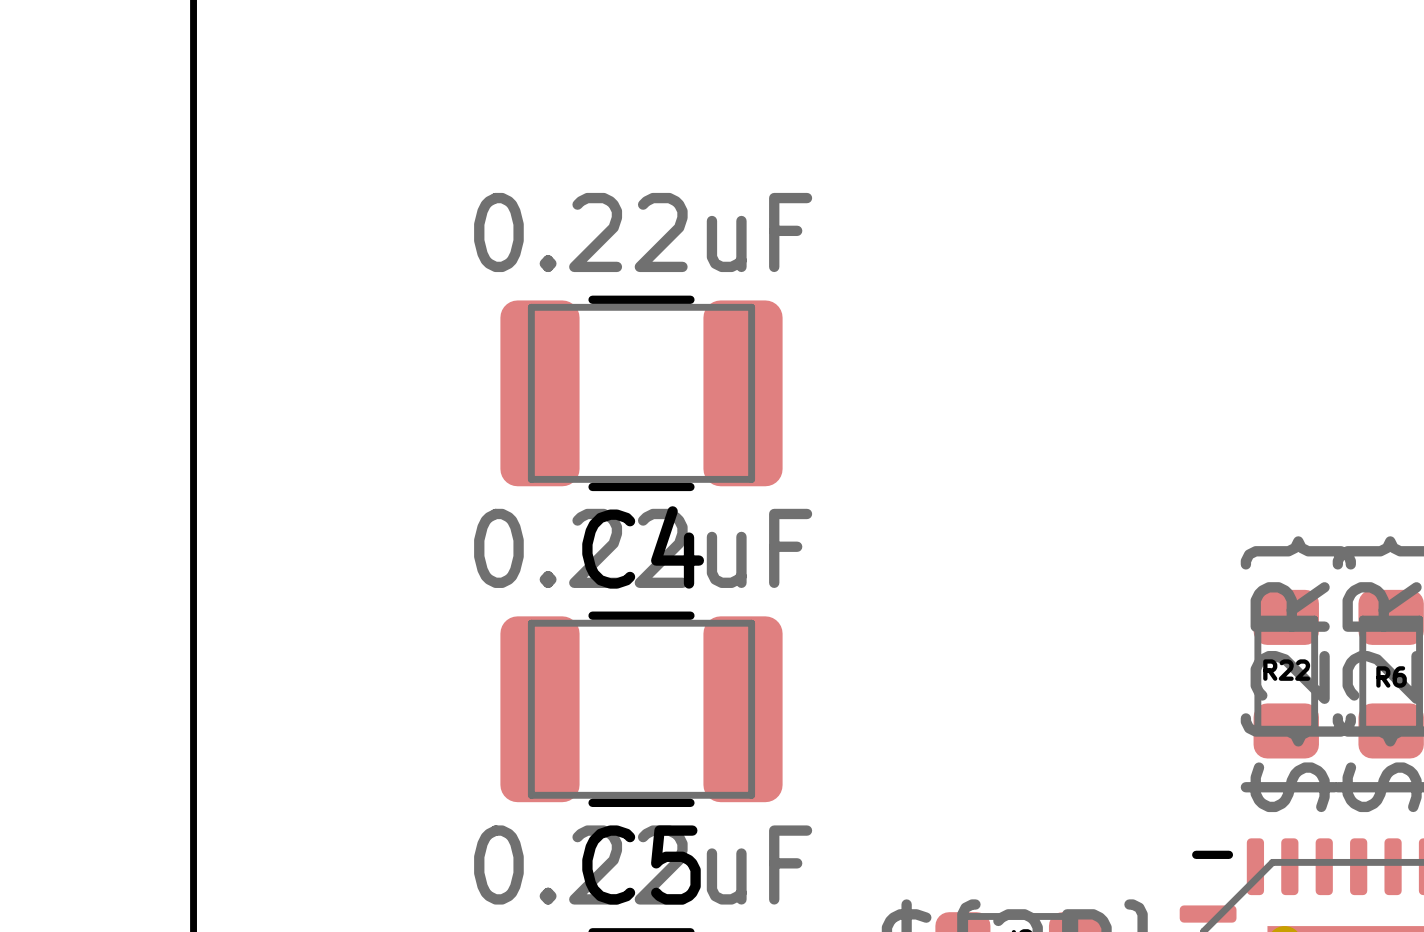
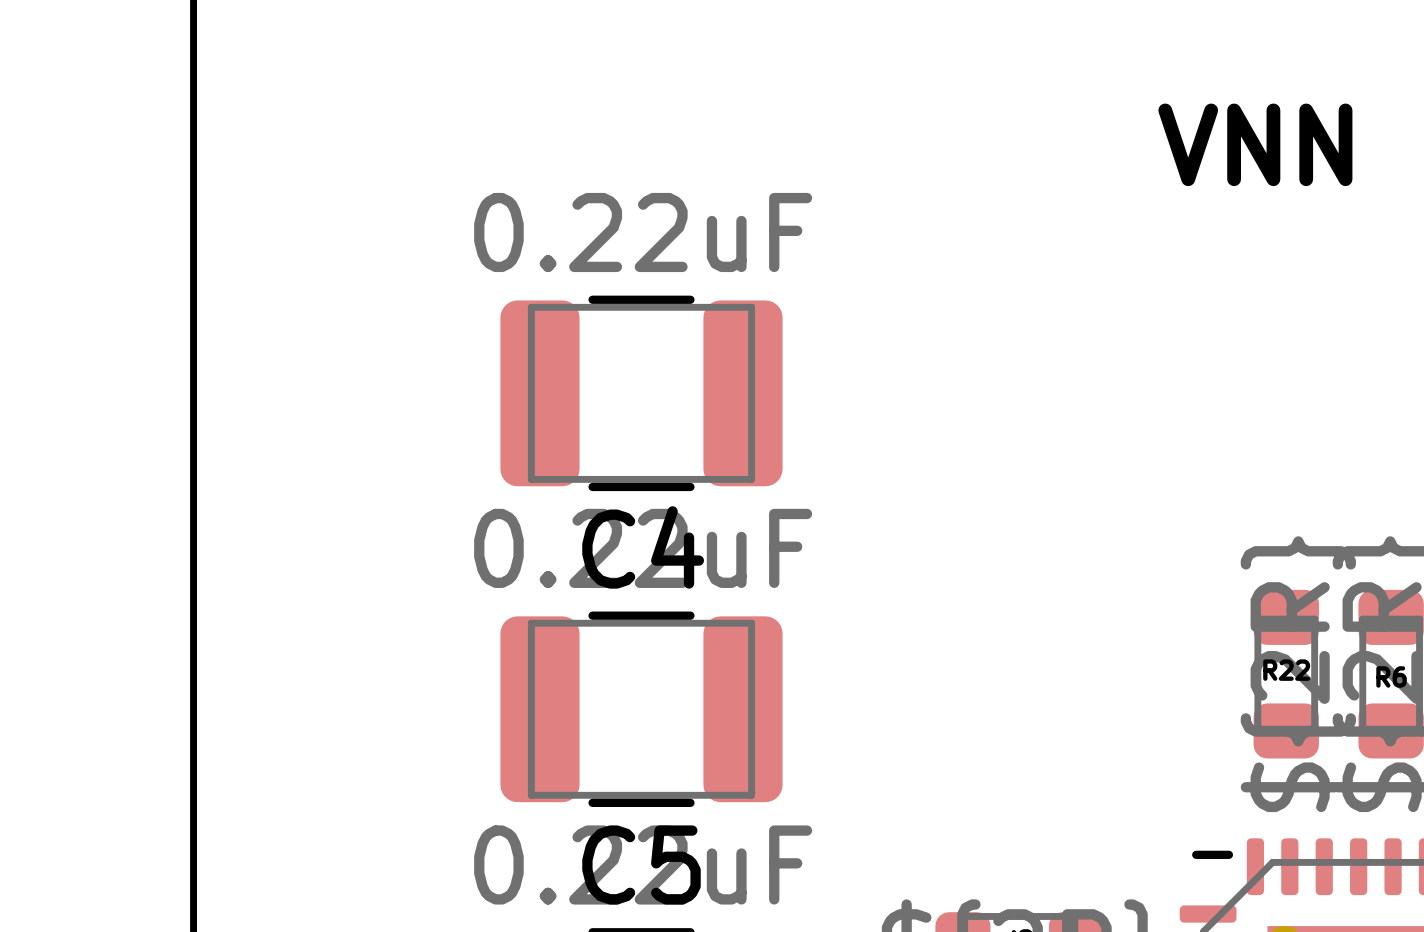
text: none -> VNN (1255, 144)

